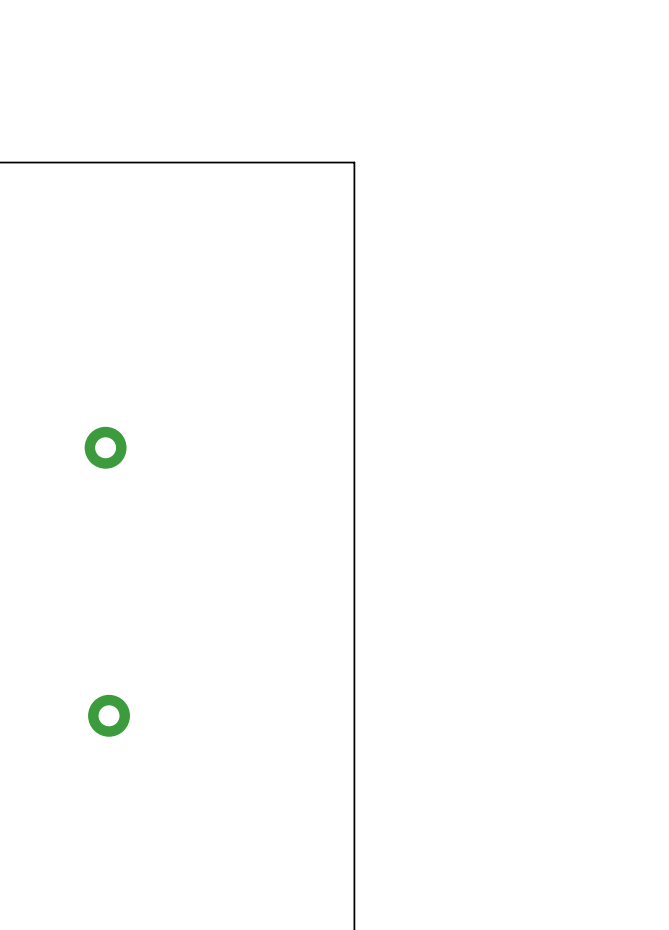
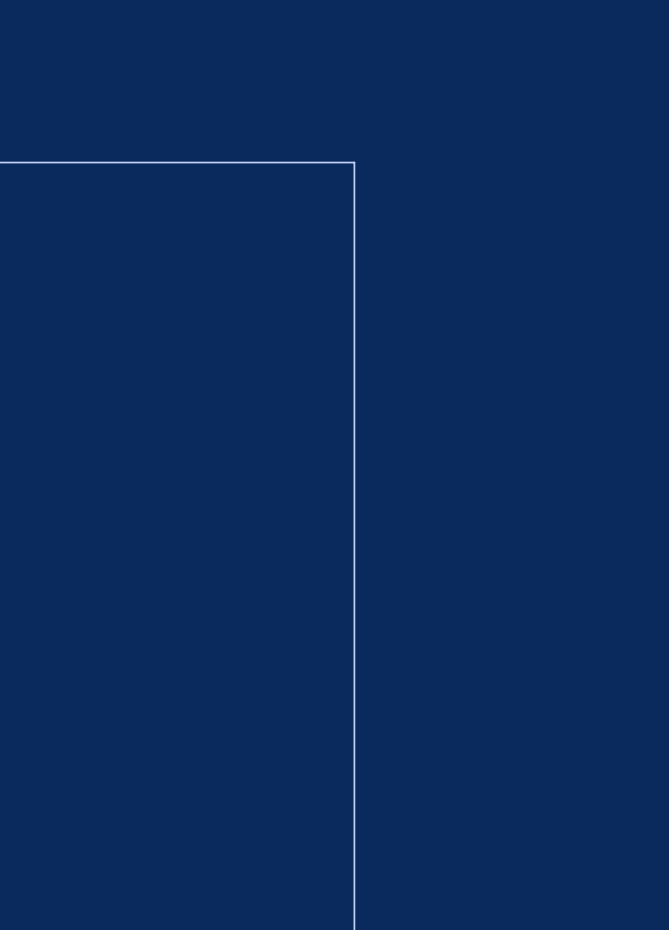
via: (105, 447) -> none
via: (109, 715) -> none

